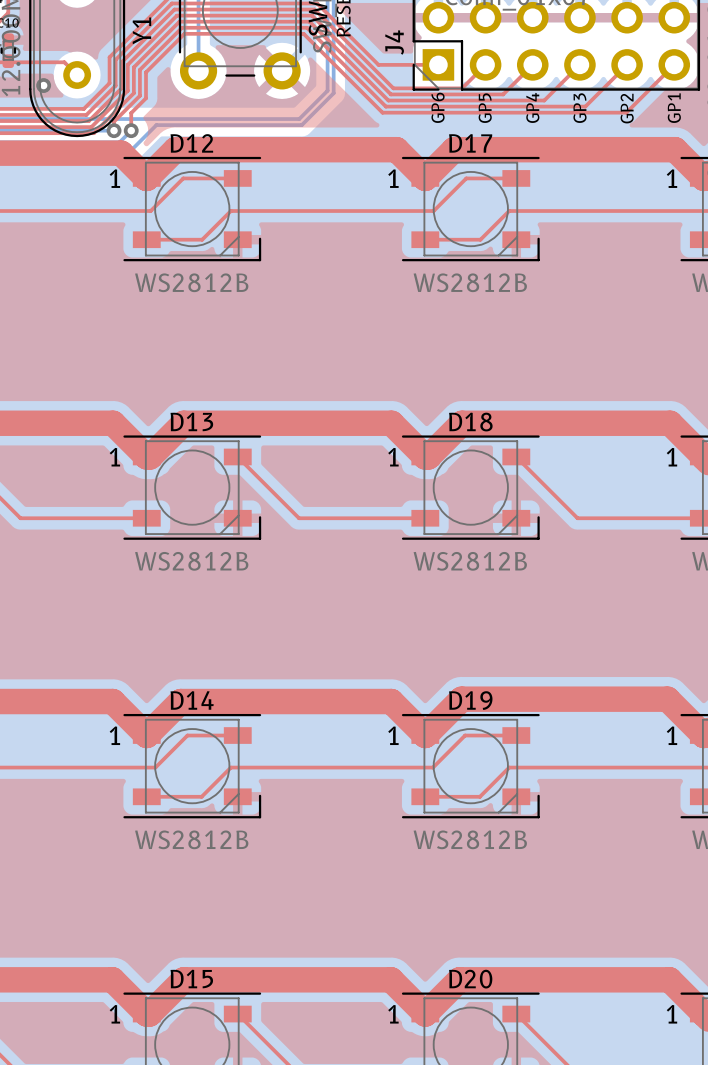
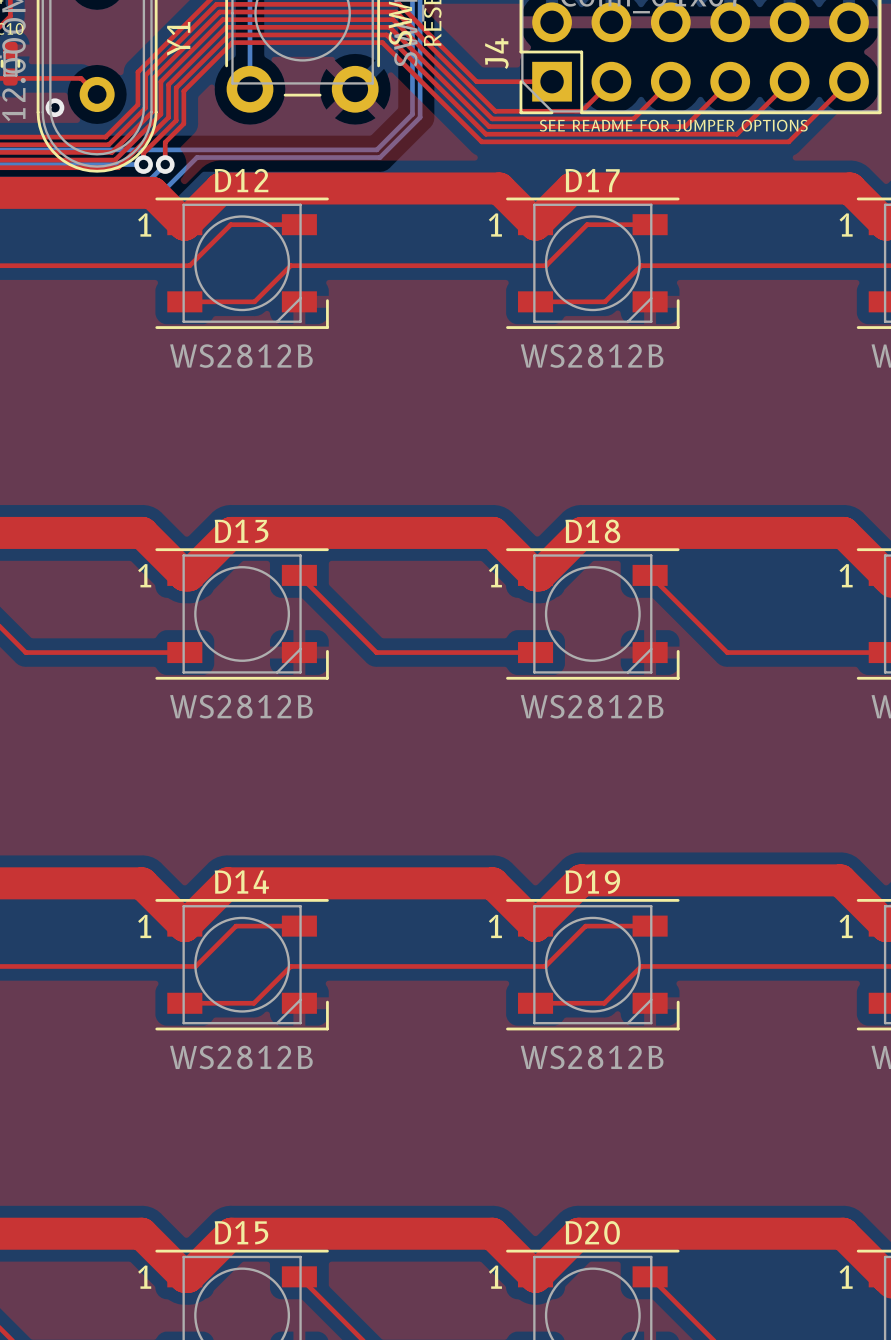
text: GP6 (438, 107) -> none
text: GP4 (532, 107) -> SEE README FOR JUMPER OPTIONS (673, 125)
text: GP5 (485, 108) -> none
text: GP3 (580, 108) -> none
text: GP2 (627, 108) -> none
text: GP1 (674, 108) -> none

